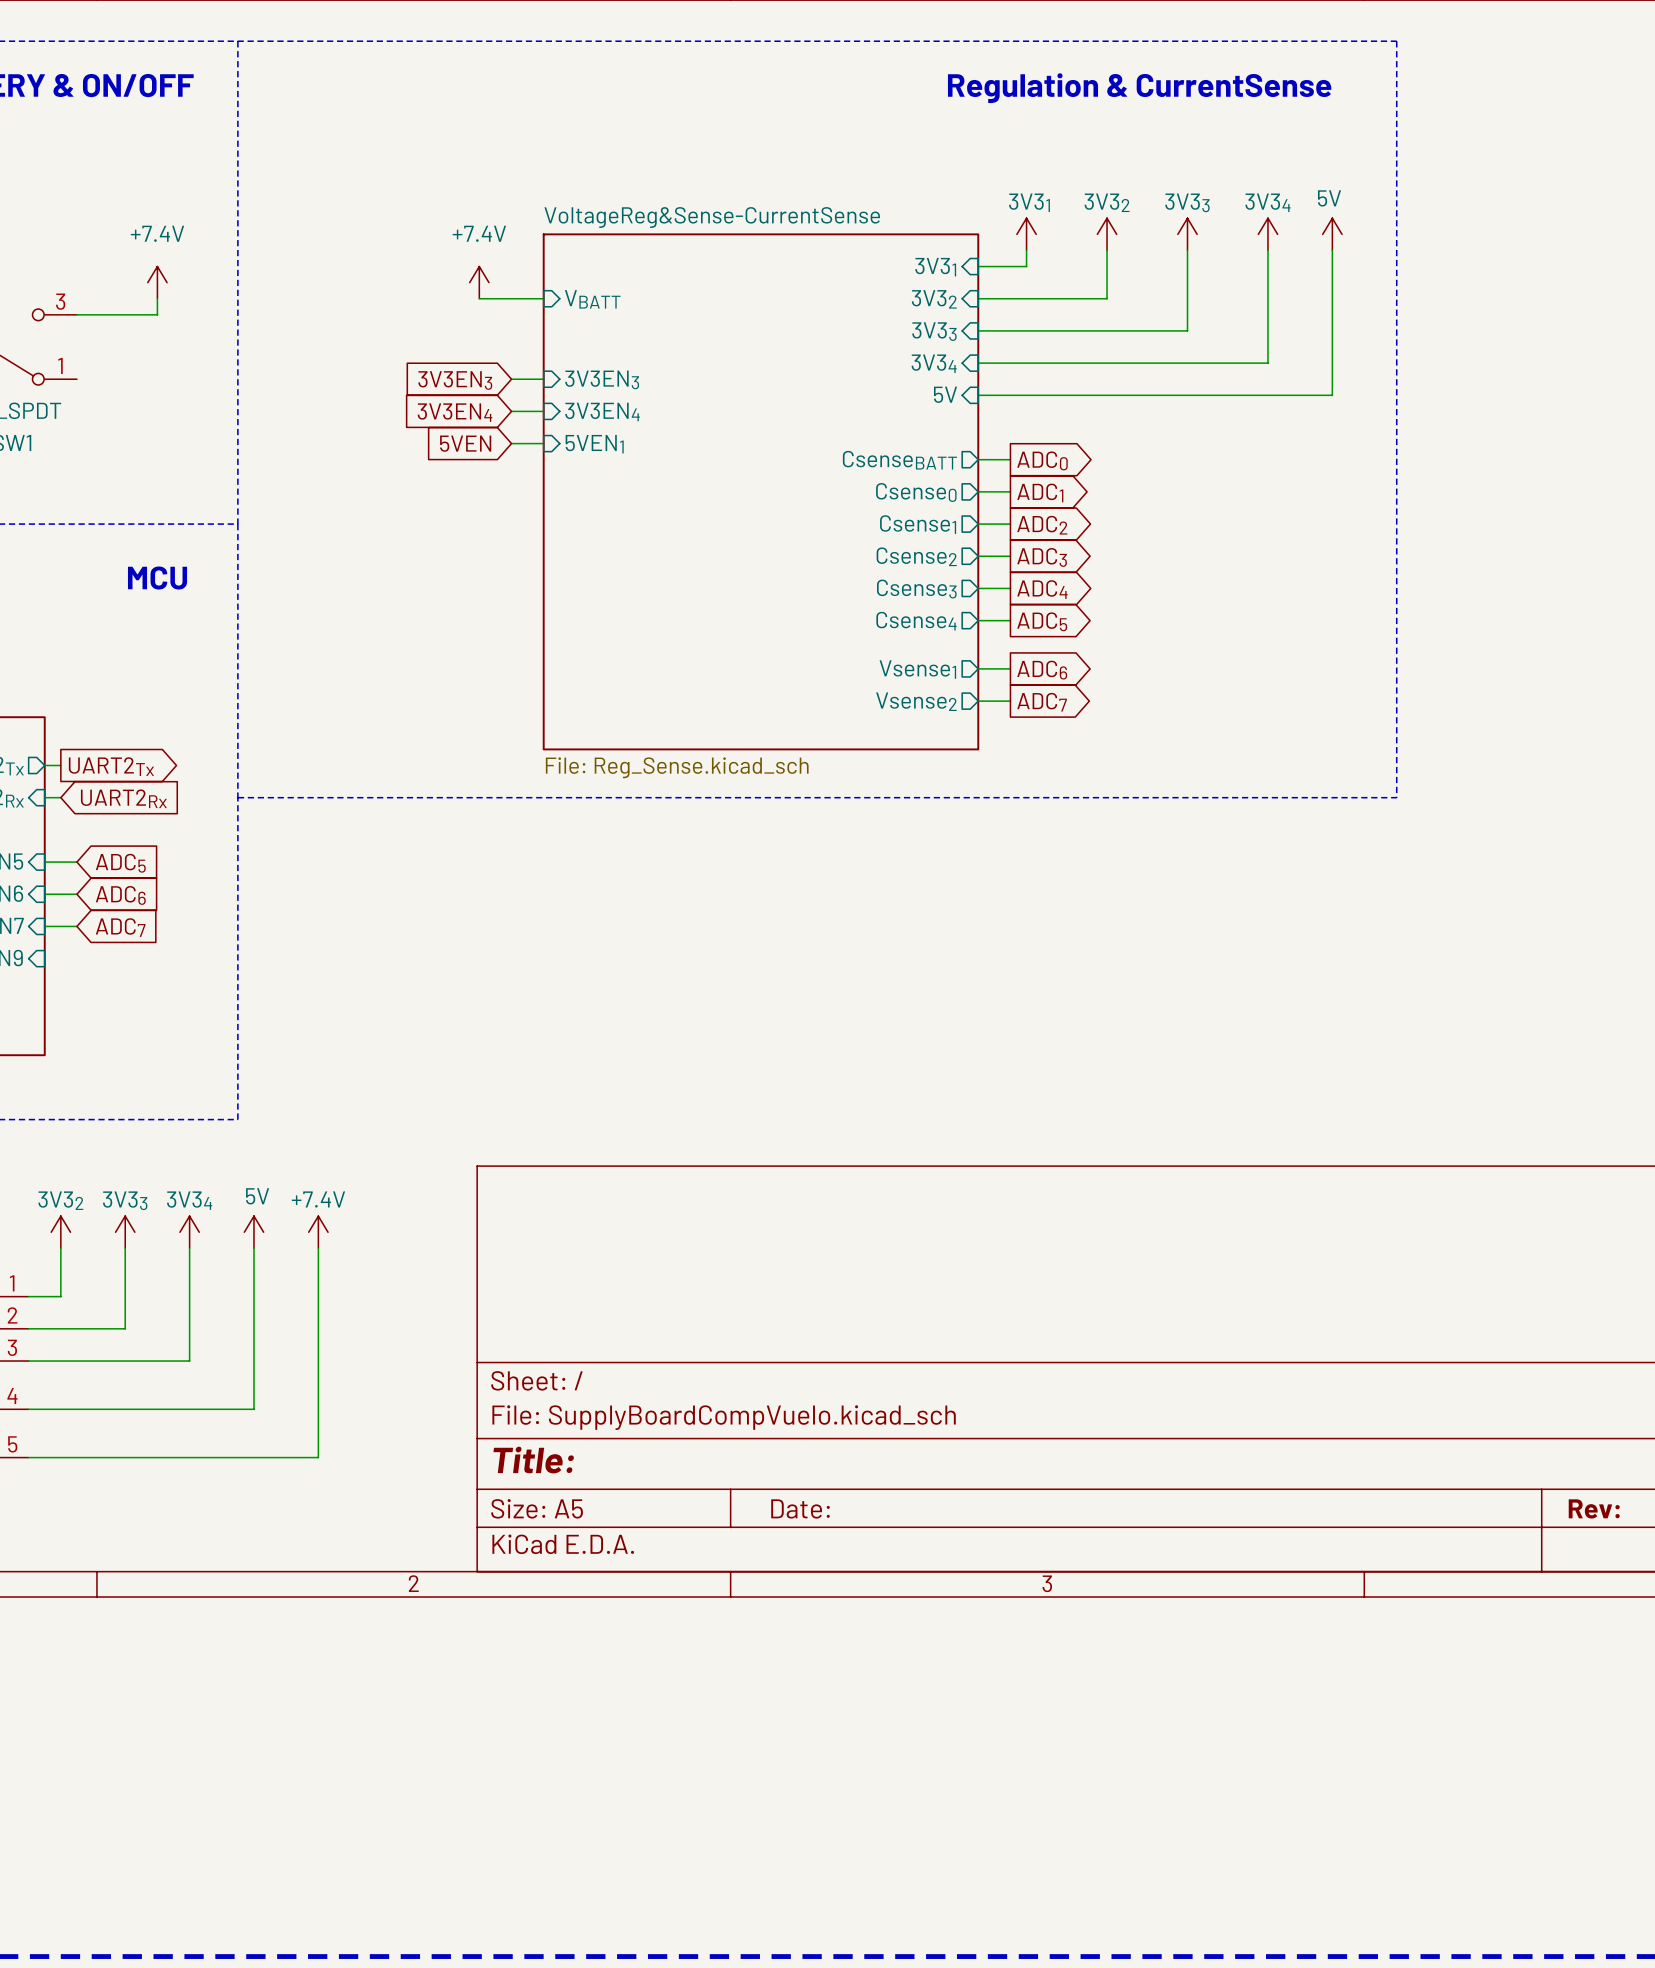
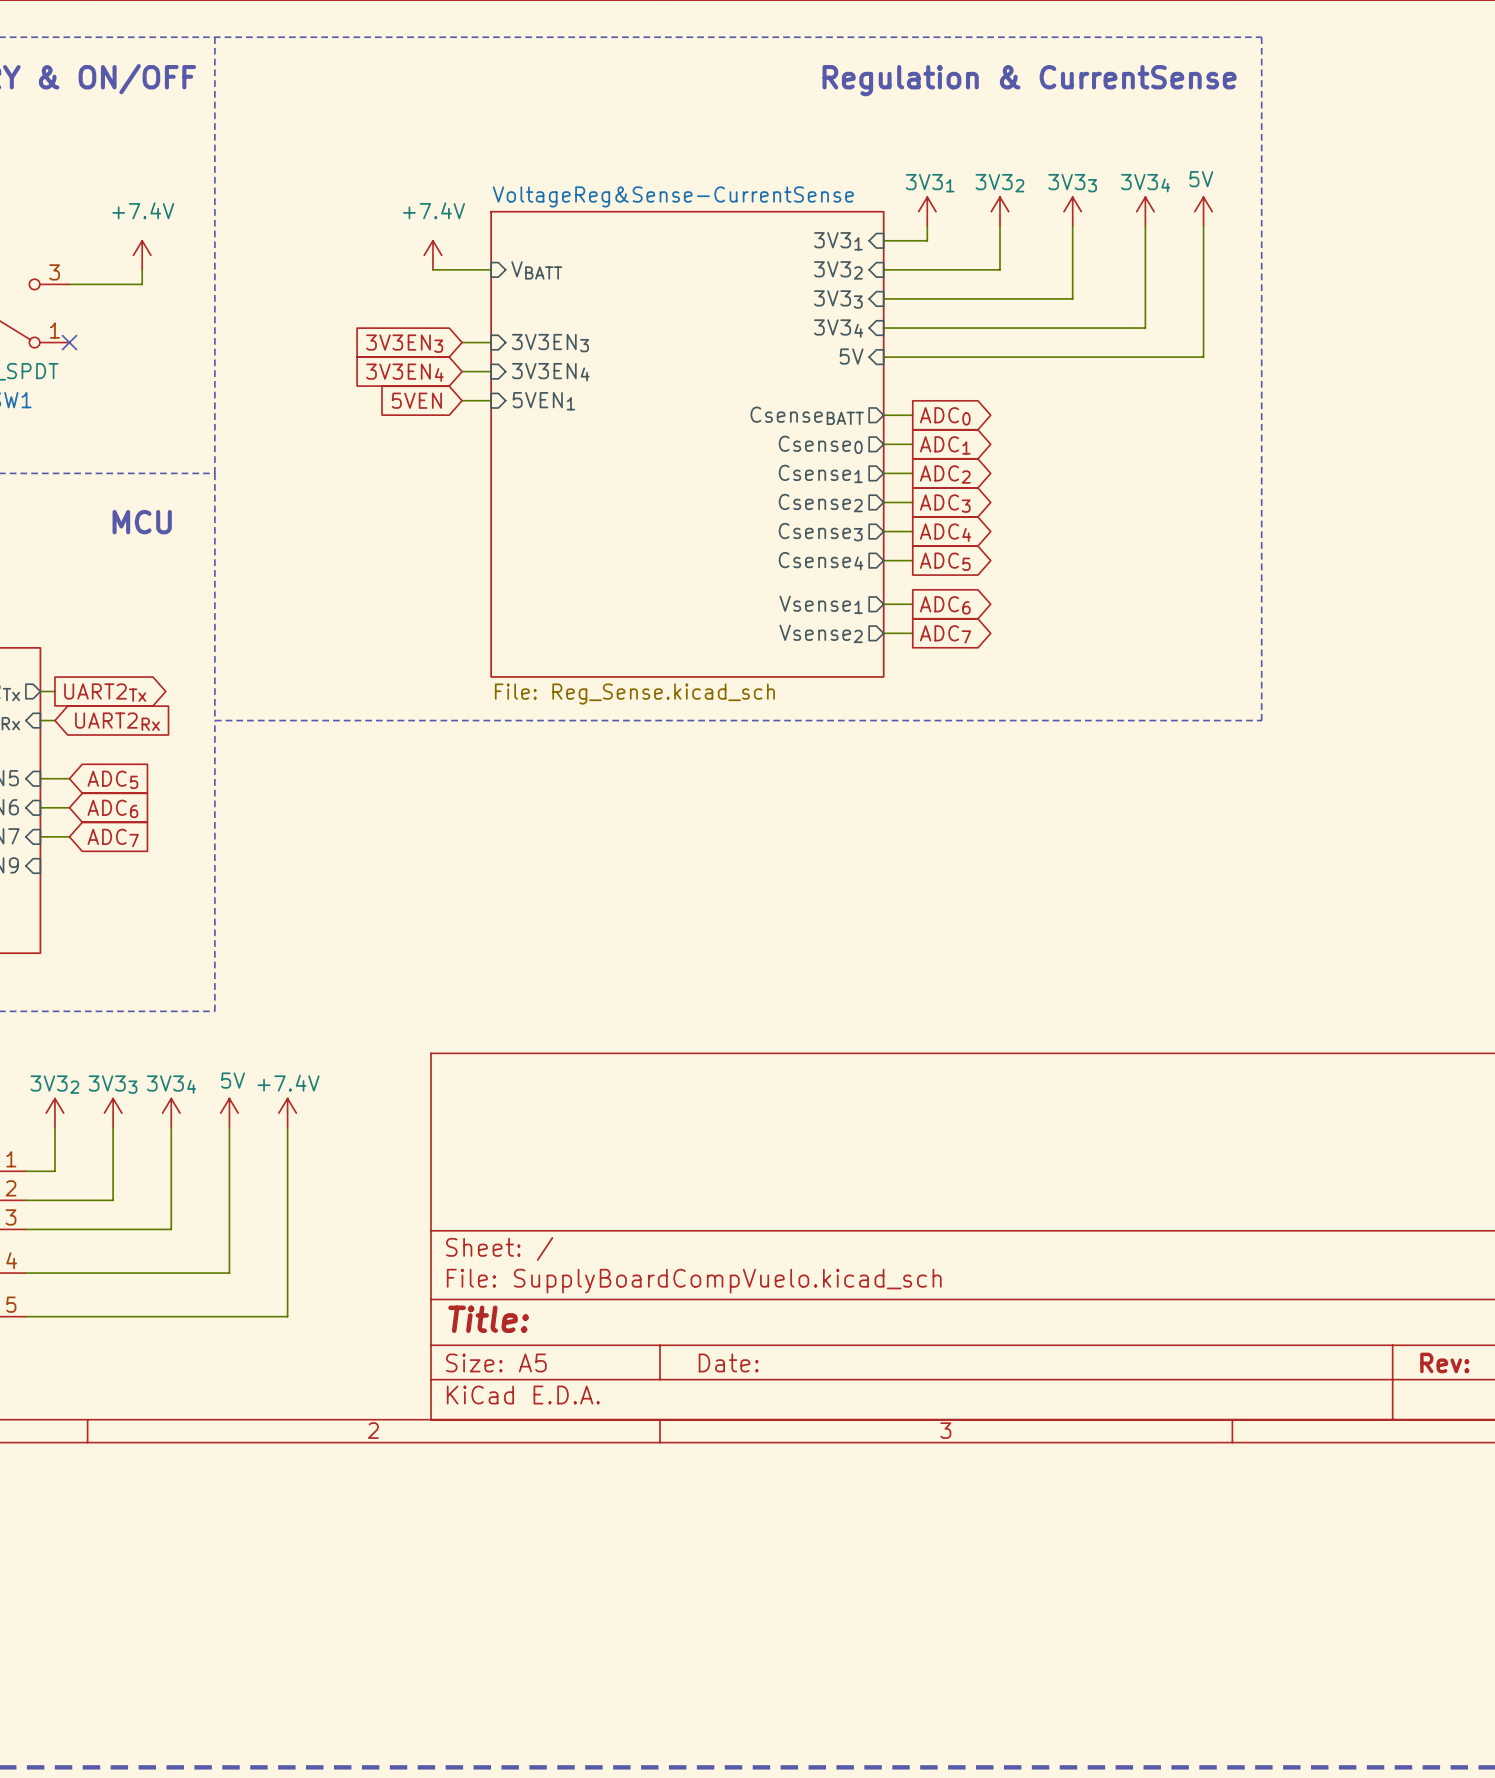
no-connect mark: none -> (69, 342)

